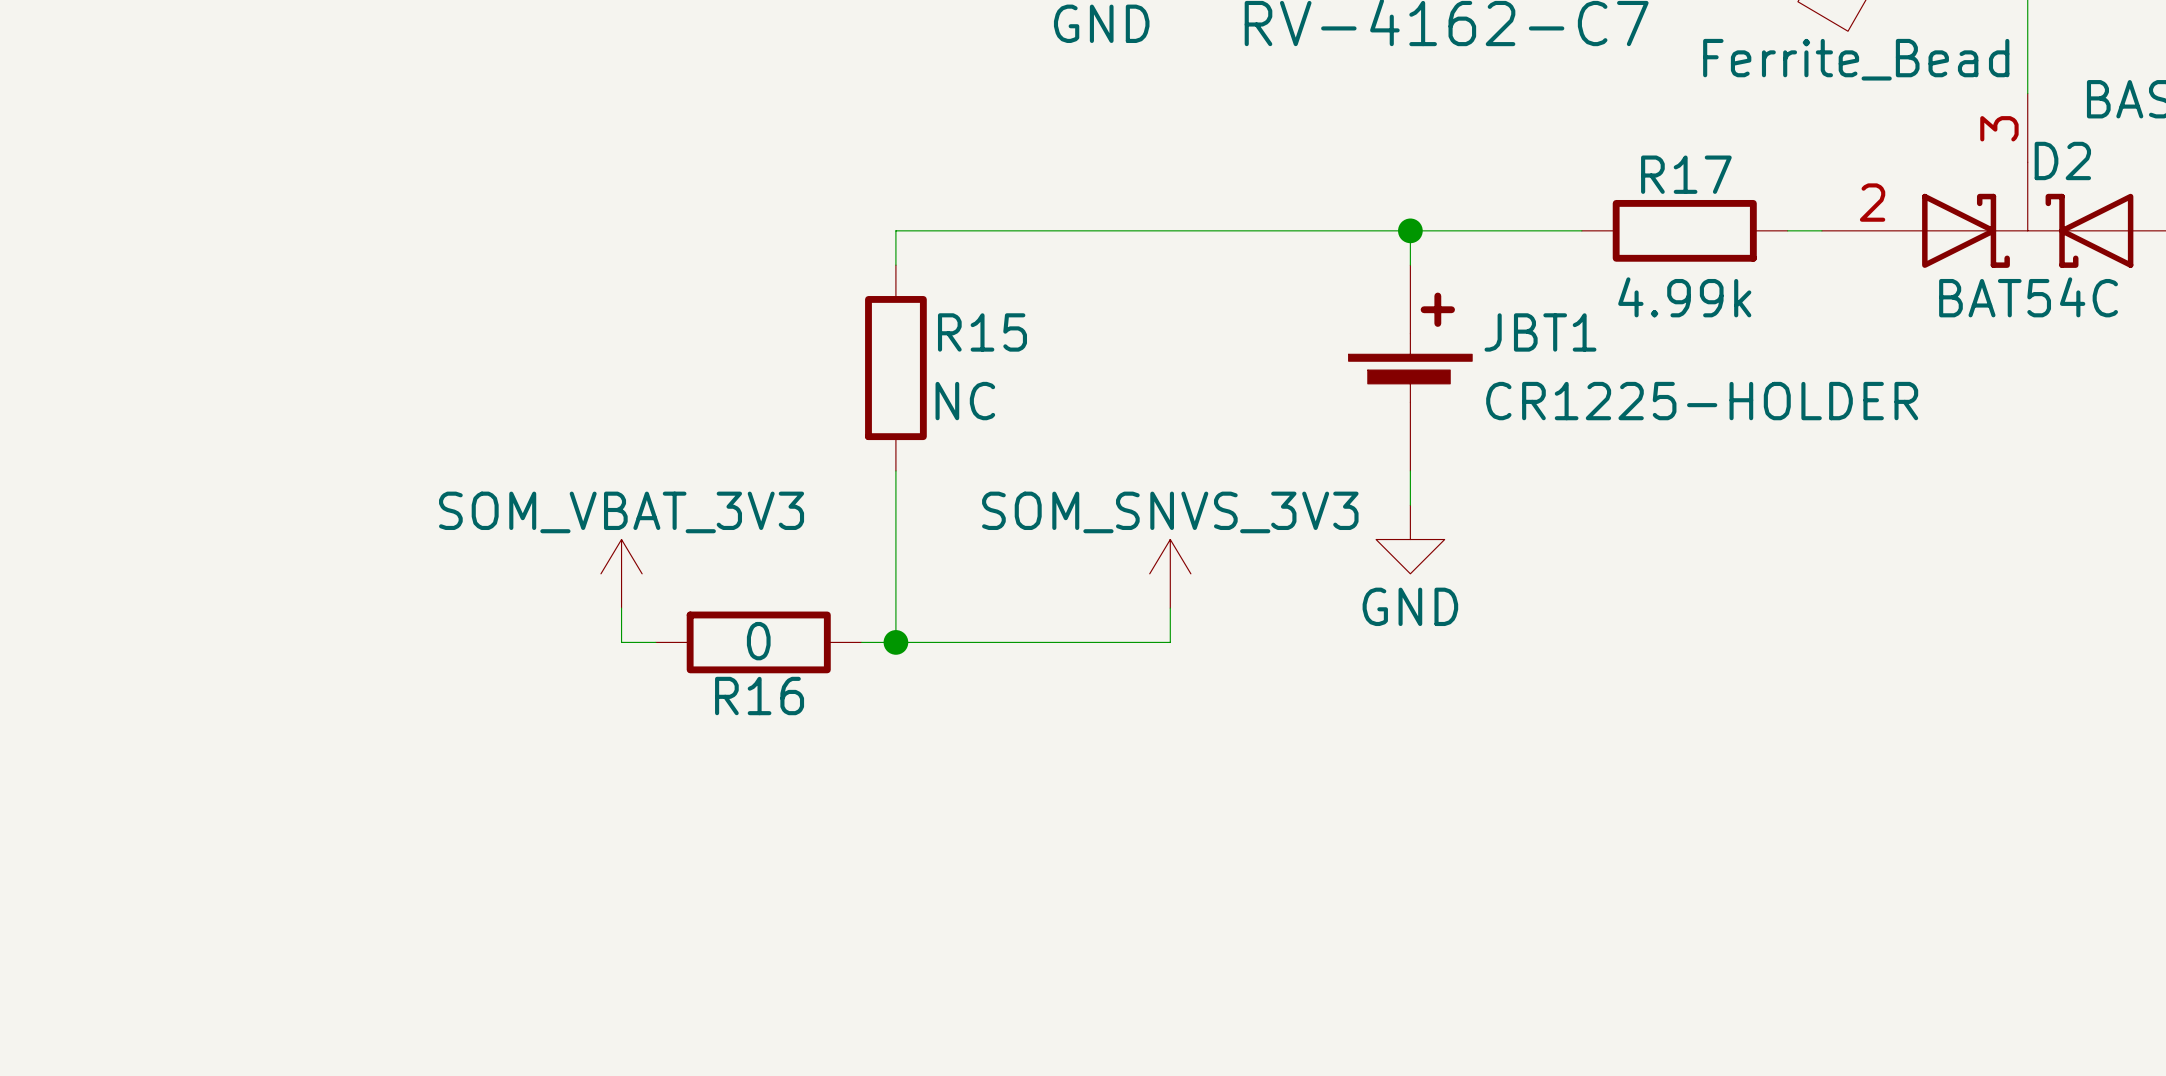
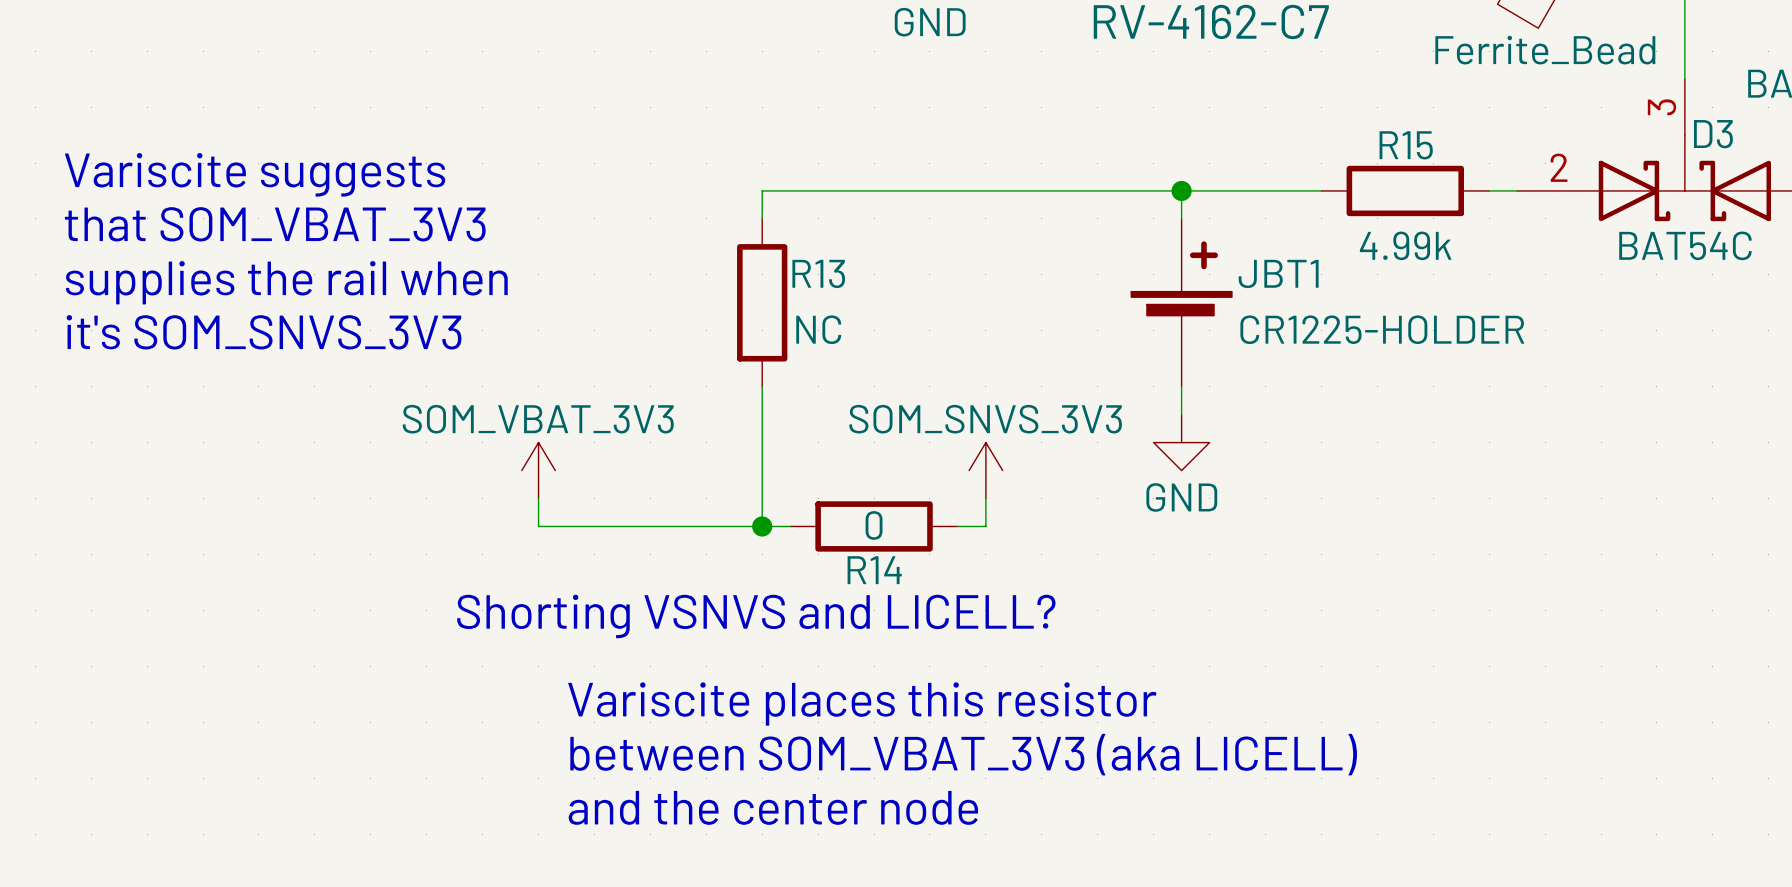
D2 name: D2 (2062, 160) -> D3 (1713, 134)
R17 name: R17 (1686, 174) -> R15 (1406, 145)
text: none -> Variscite suggests (255, 174)
text: none -> that SOM_VBAT_3V3 (275, 224)
R15 name: R15 (982, 332) -> R13 (818, 273)
text: none -> supplies the rail when (286, 282)
text: none -> it's SOM_SNVS_3V3 (264, 332)
R16: 0 (758, 642) -> none
wire: (930, 642) (1136, 642) -> (566, 526) (734, 526)
R14: none -> 0 (874, 526)
text: none -> Shorting VSNVS and LICELL? (756, 616)
text: none -> Variscite places this resistor (862, 704)
text: none -> between SOM_VBAT_3V3 (aka LICELL) (963, 754)
text: none -> and the center node (773, 807)

